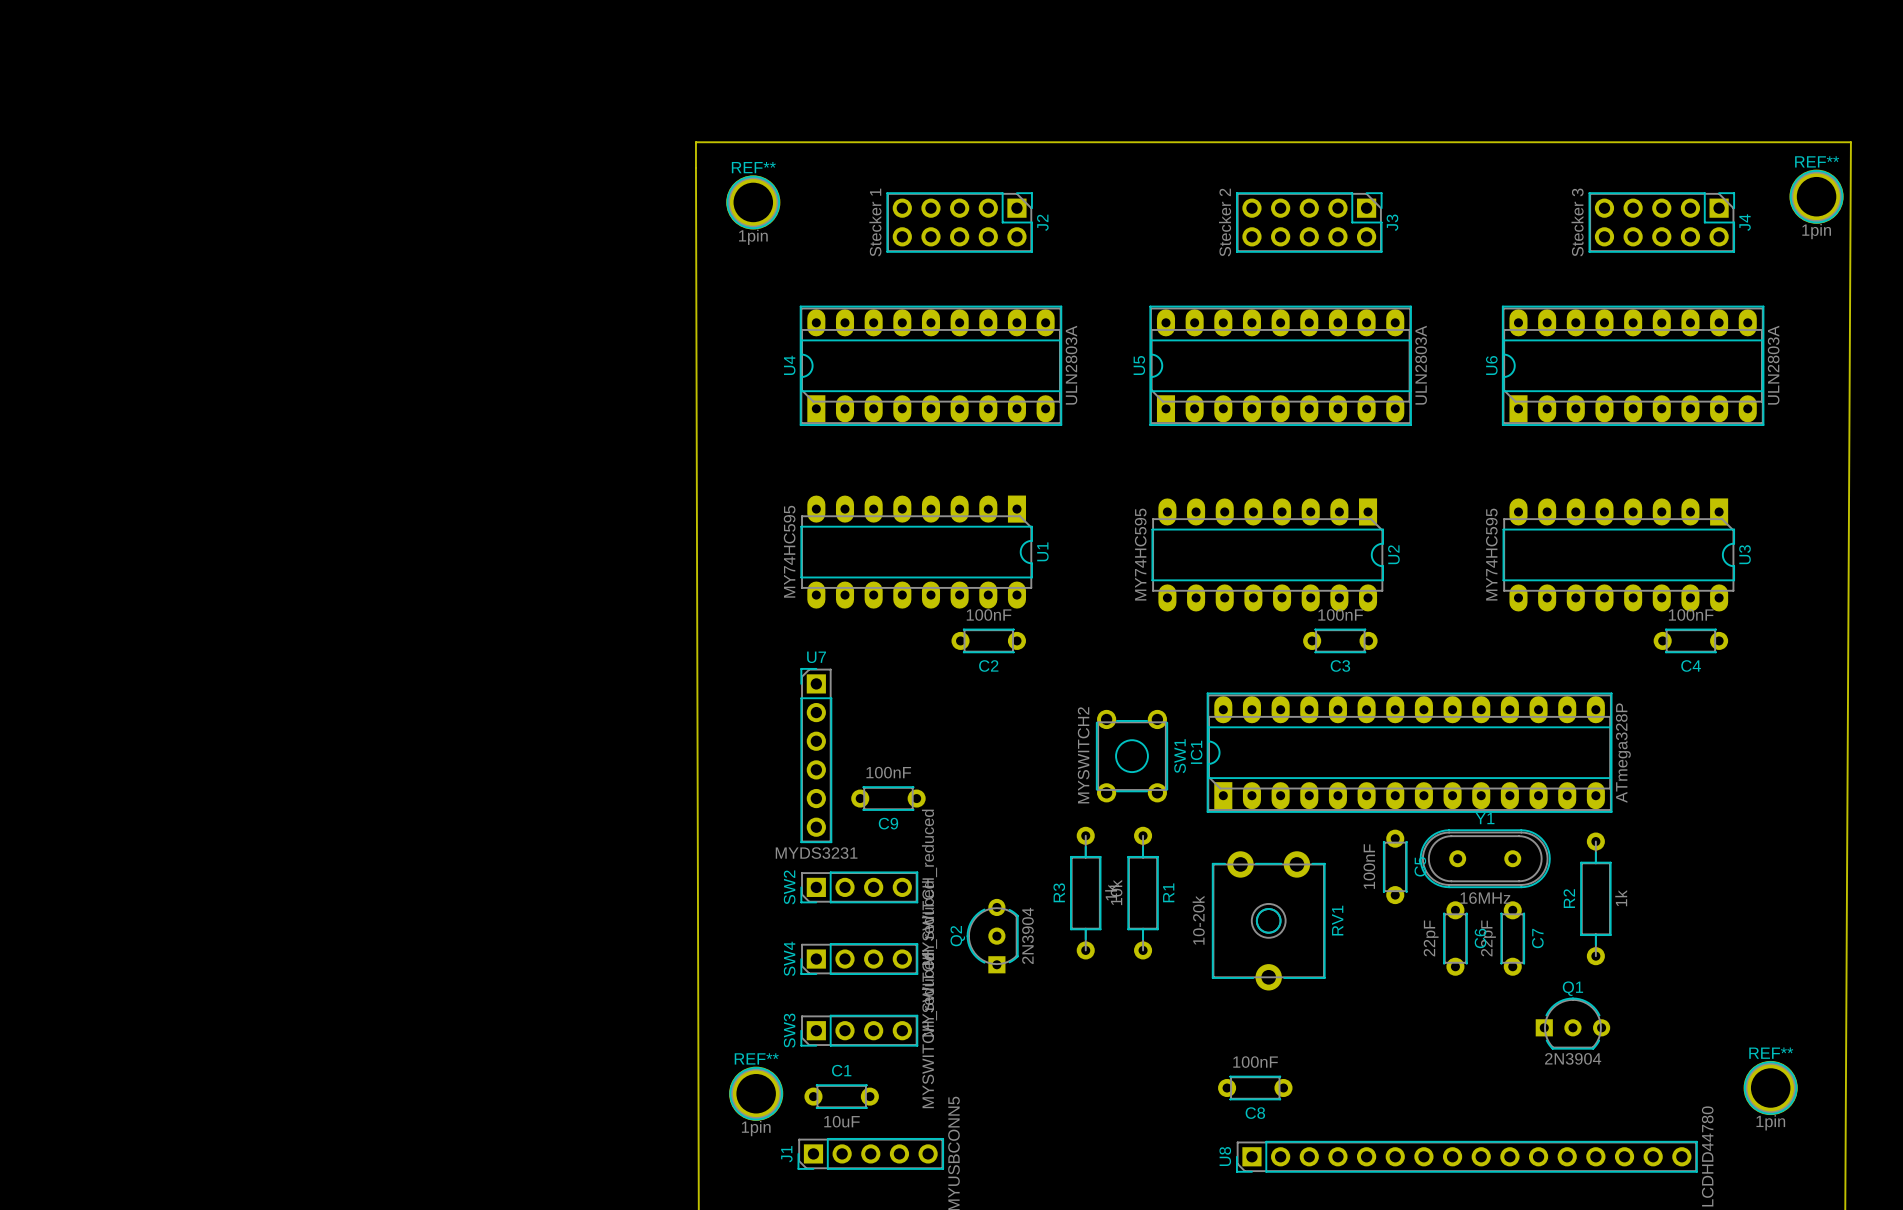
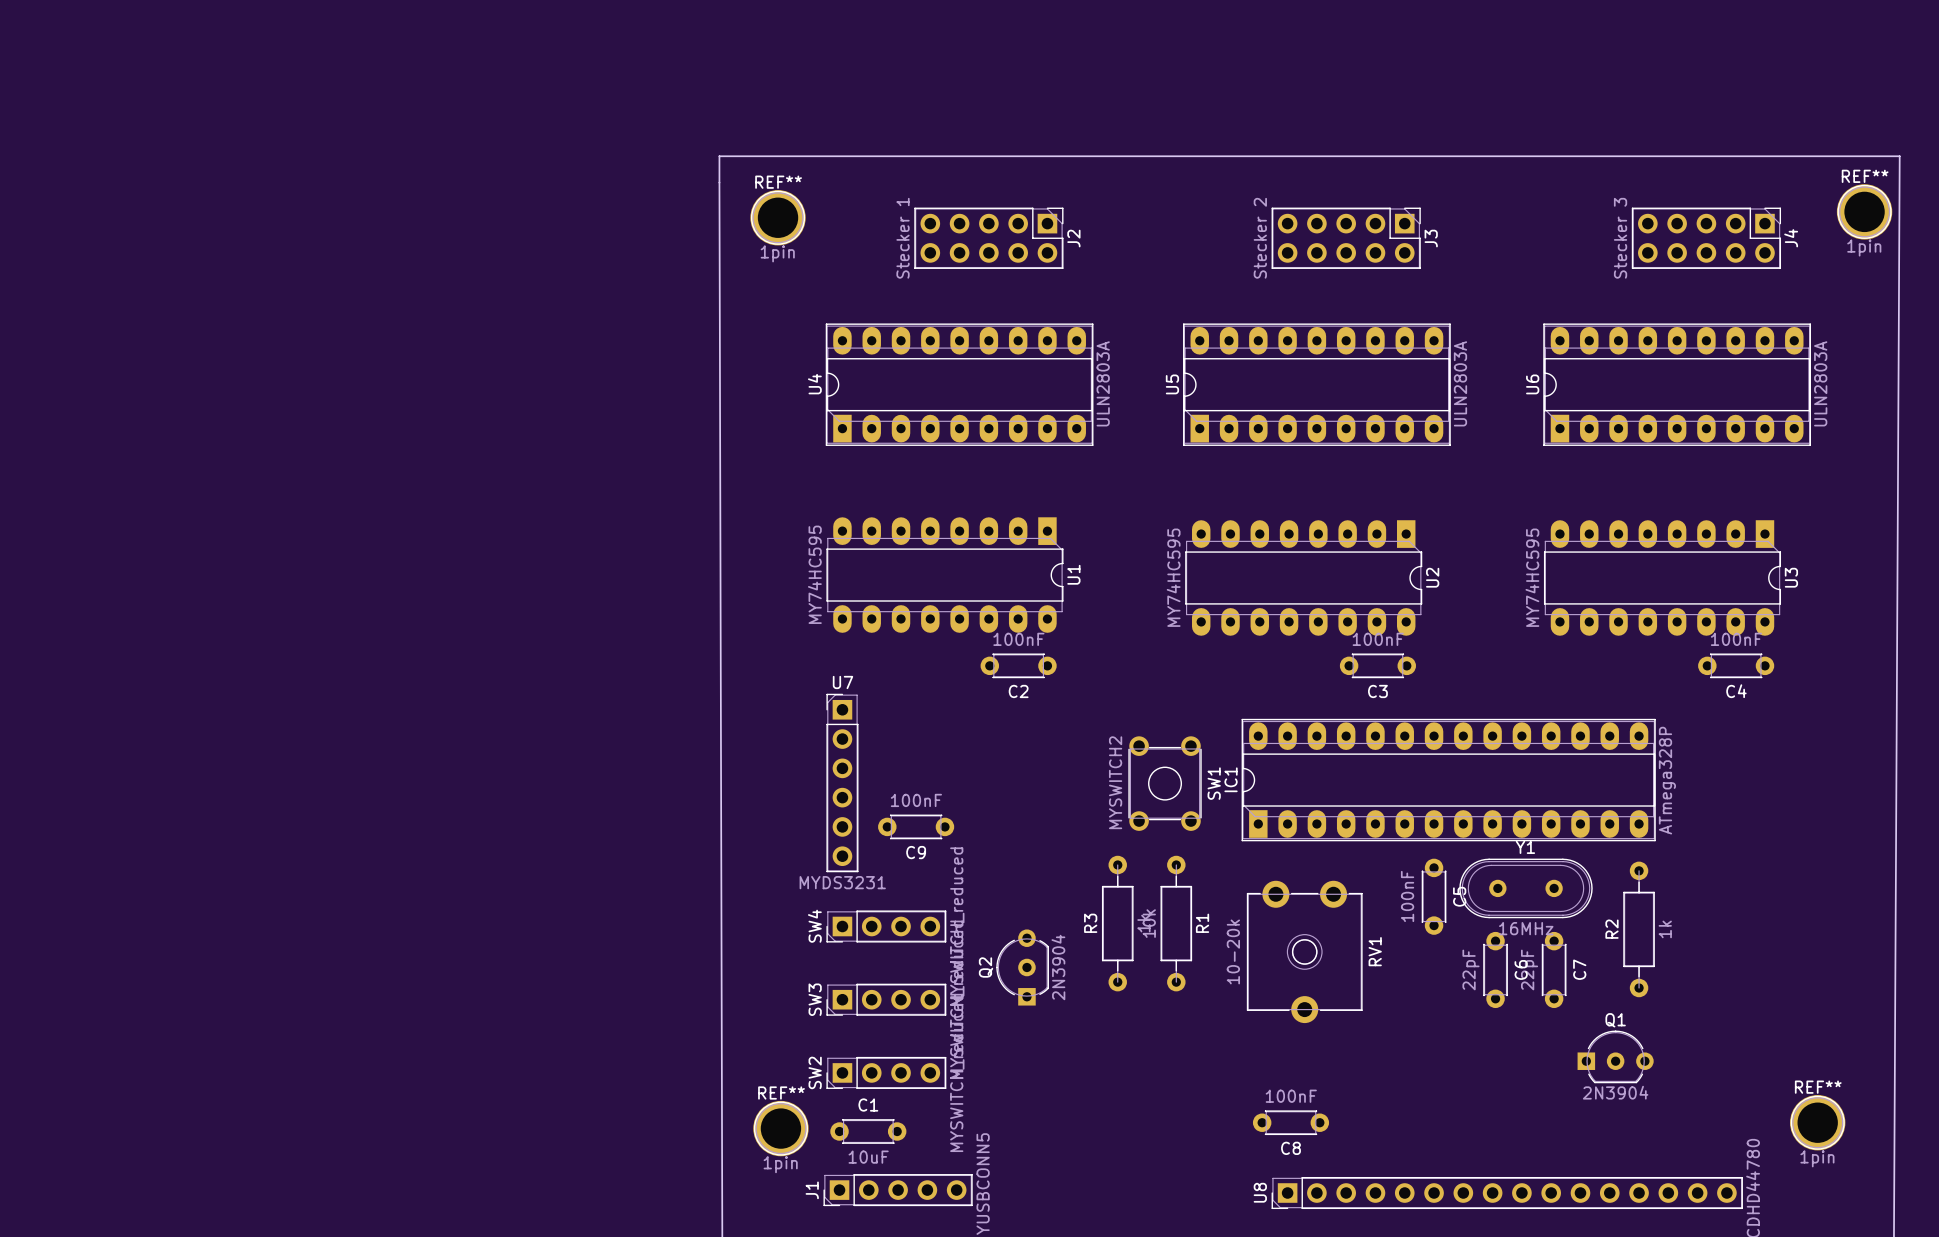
SW2 position: (859, 887) -> (886, 1072)
SW4 position: (859, 959) -> (886, 926)
SW3 position: (859, 1030) -> (886, 999)

